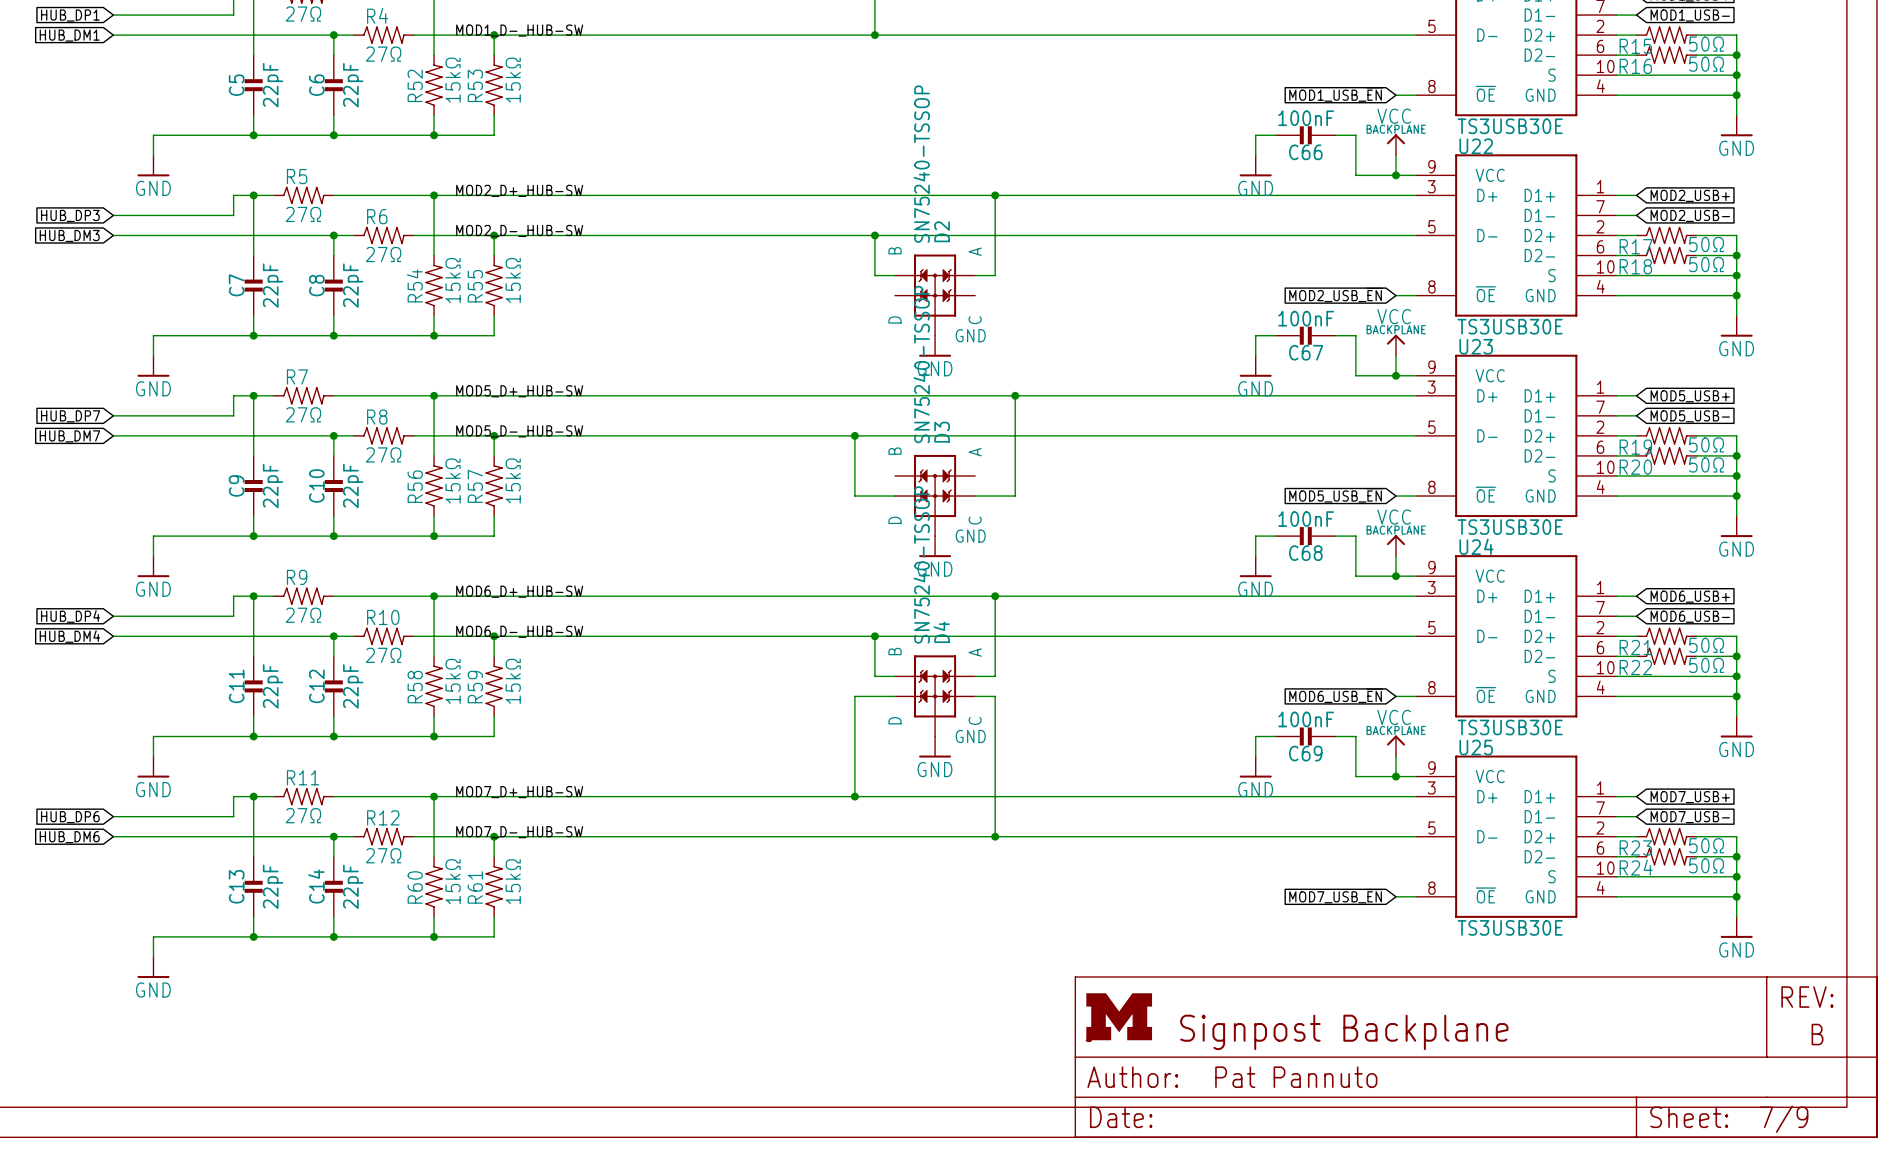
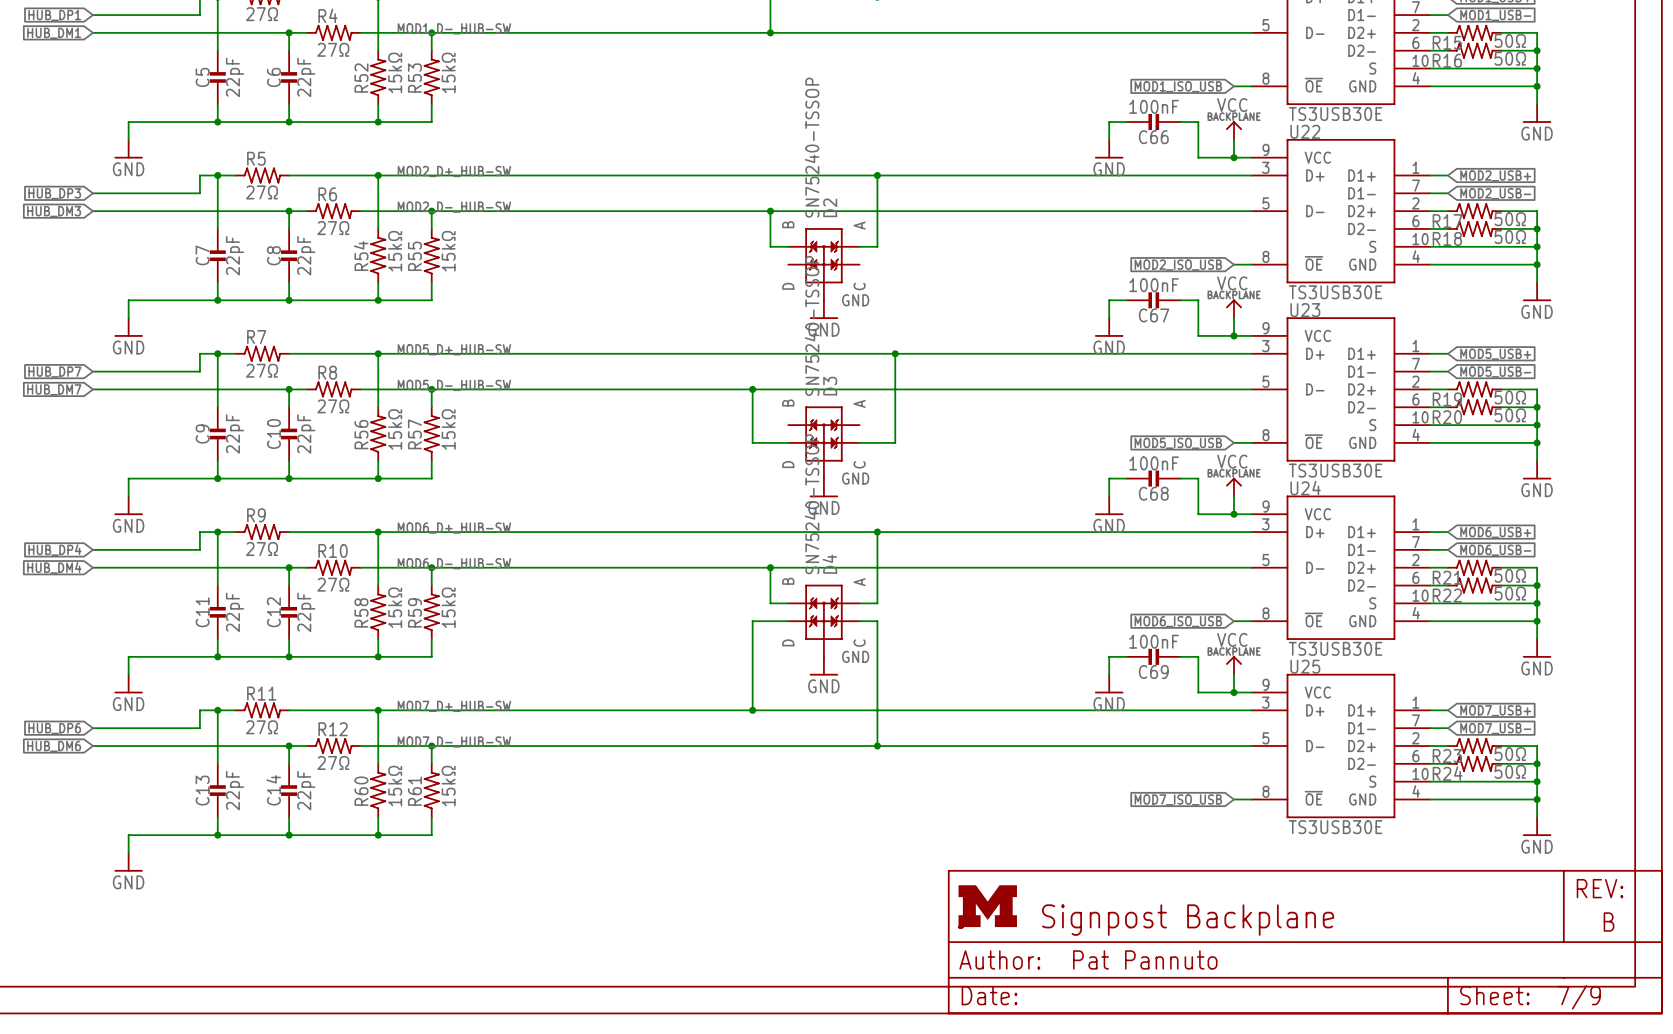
global label: MOD1_USB_~{EN} (1336, 94) -> MOD1_ISO_USB (1178, 86)
global label: MOD2_USB_~{EN} (1336, 294) -> MOD2_ISO_USB (1178, 265)
global label: MOD5_USB_~{EN} (1336, 495) -> MOD5_ISO_USB (1178, 443)
global label: MOD6_USB_~{EN} (1336, 695) -> MOD6_ISO_USB (1178, 621)
global label: MOD7_USB_~{EN} (1336, 896) -> MOD7_ISO_USB (1178, 799)

